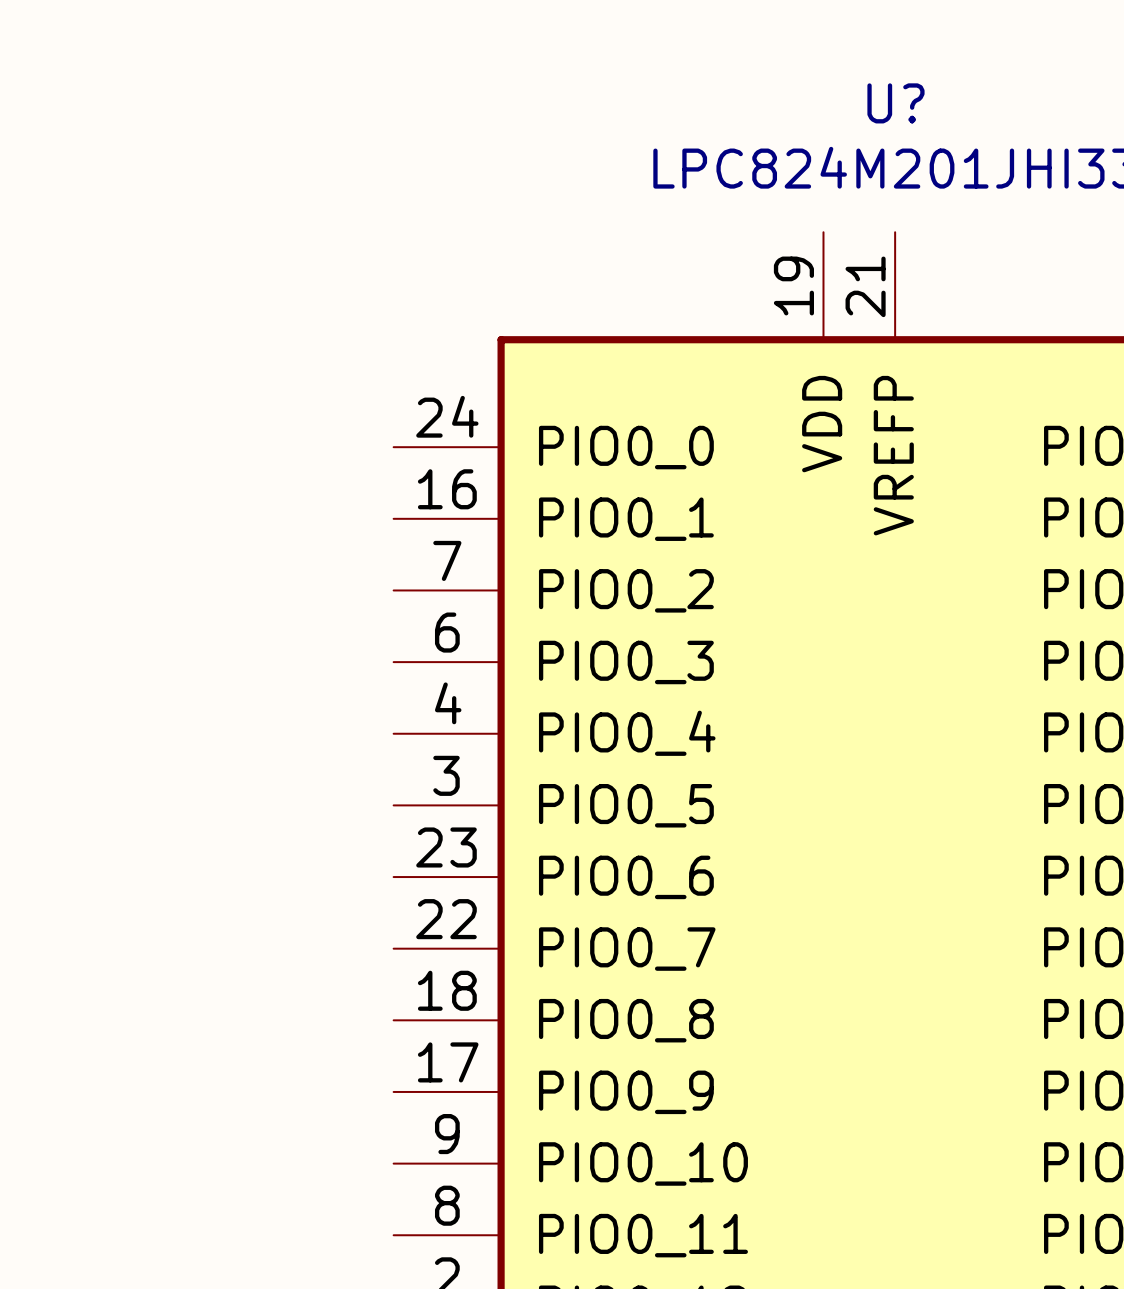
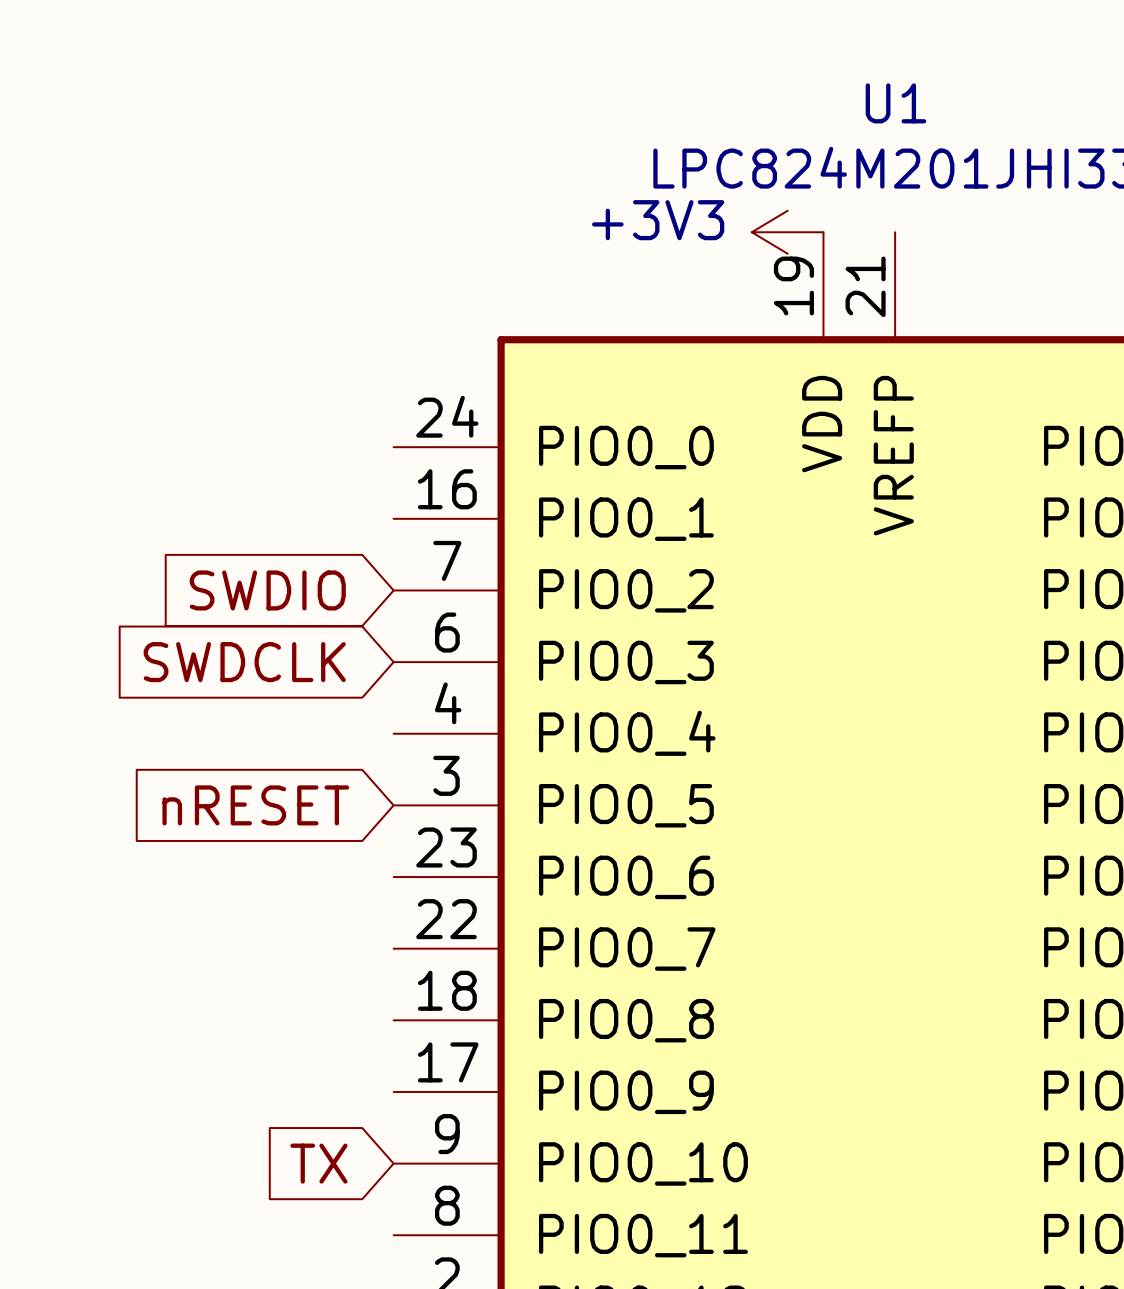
U? name: U? (895, 103) -> U1 (895, 103)
power symbol: none -> +3V3 (787, 232)
global label: none -> SWDIO (267, 590)
global label: none -> SWDCLK (244, 662)
global label: none -> nRESET (255, 805)
global label: none -> TX (318, 1163)

